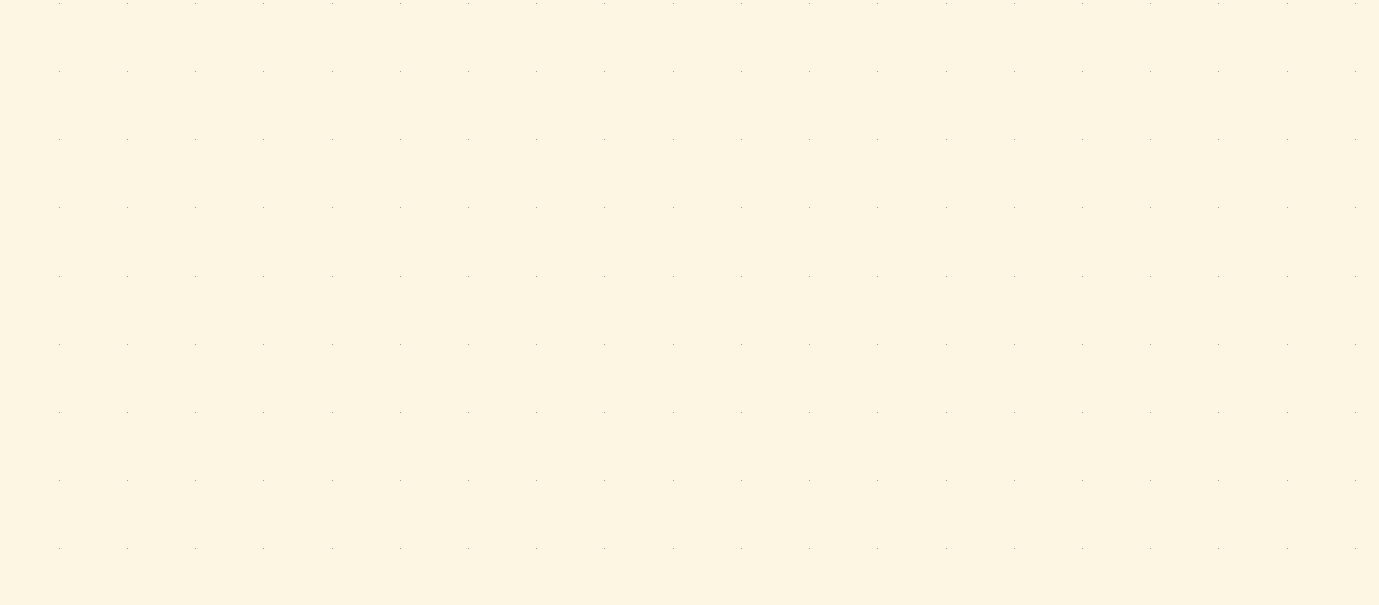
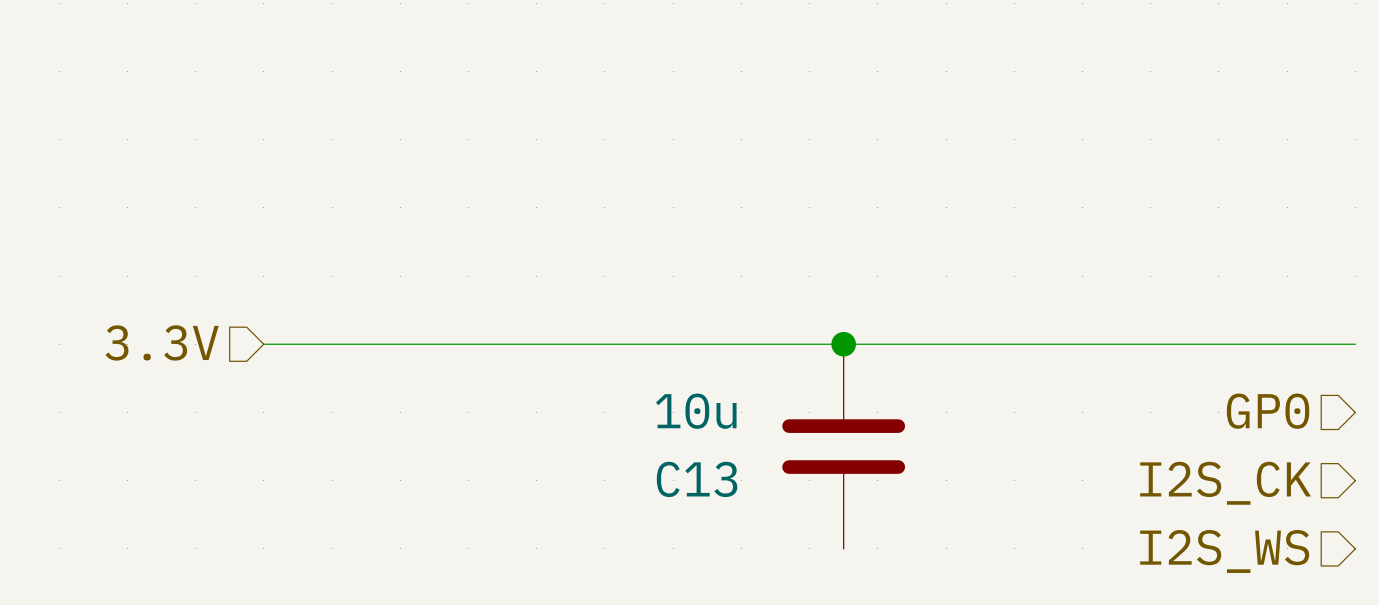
hierarchical label: none -> 3.3V (162, 342)
wire: none -> (263, 344) (1355, 344)
junction: none -> (843, 344)
hierarchical label: none -> GP0 (1268, 411)
C13: none -> 10u (843, 446)
hierarchical label: none -> I2S_CK (1225, 483)
hierarchical label: none -> I2S_WS (1224, 551)

